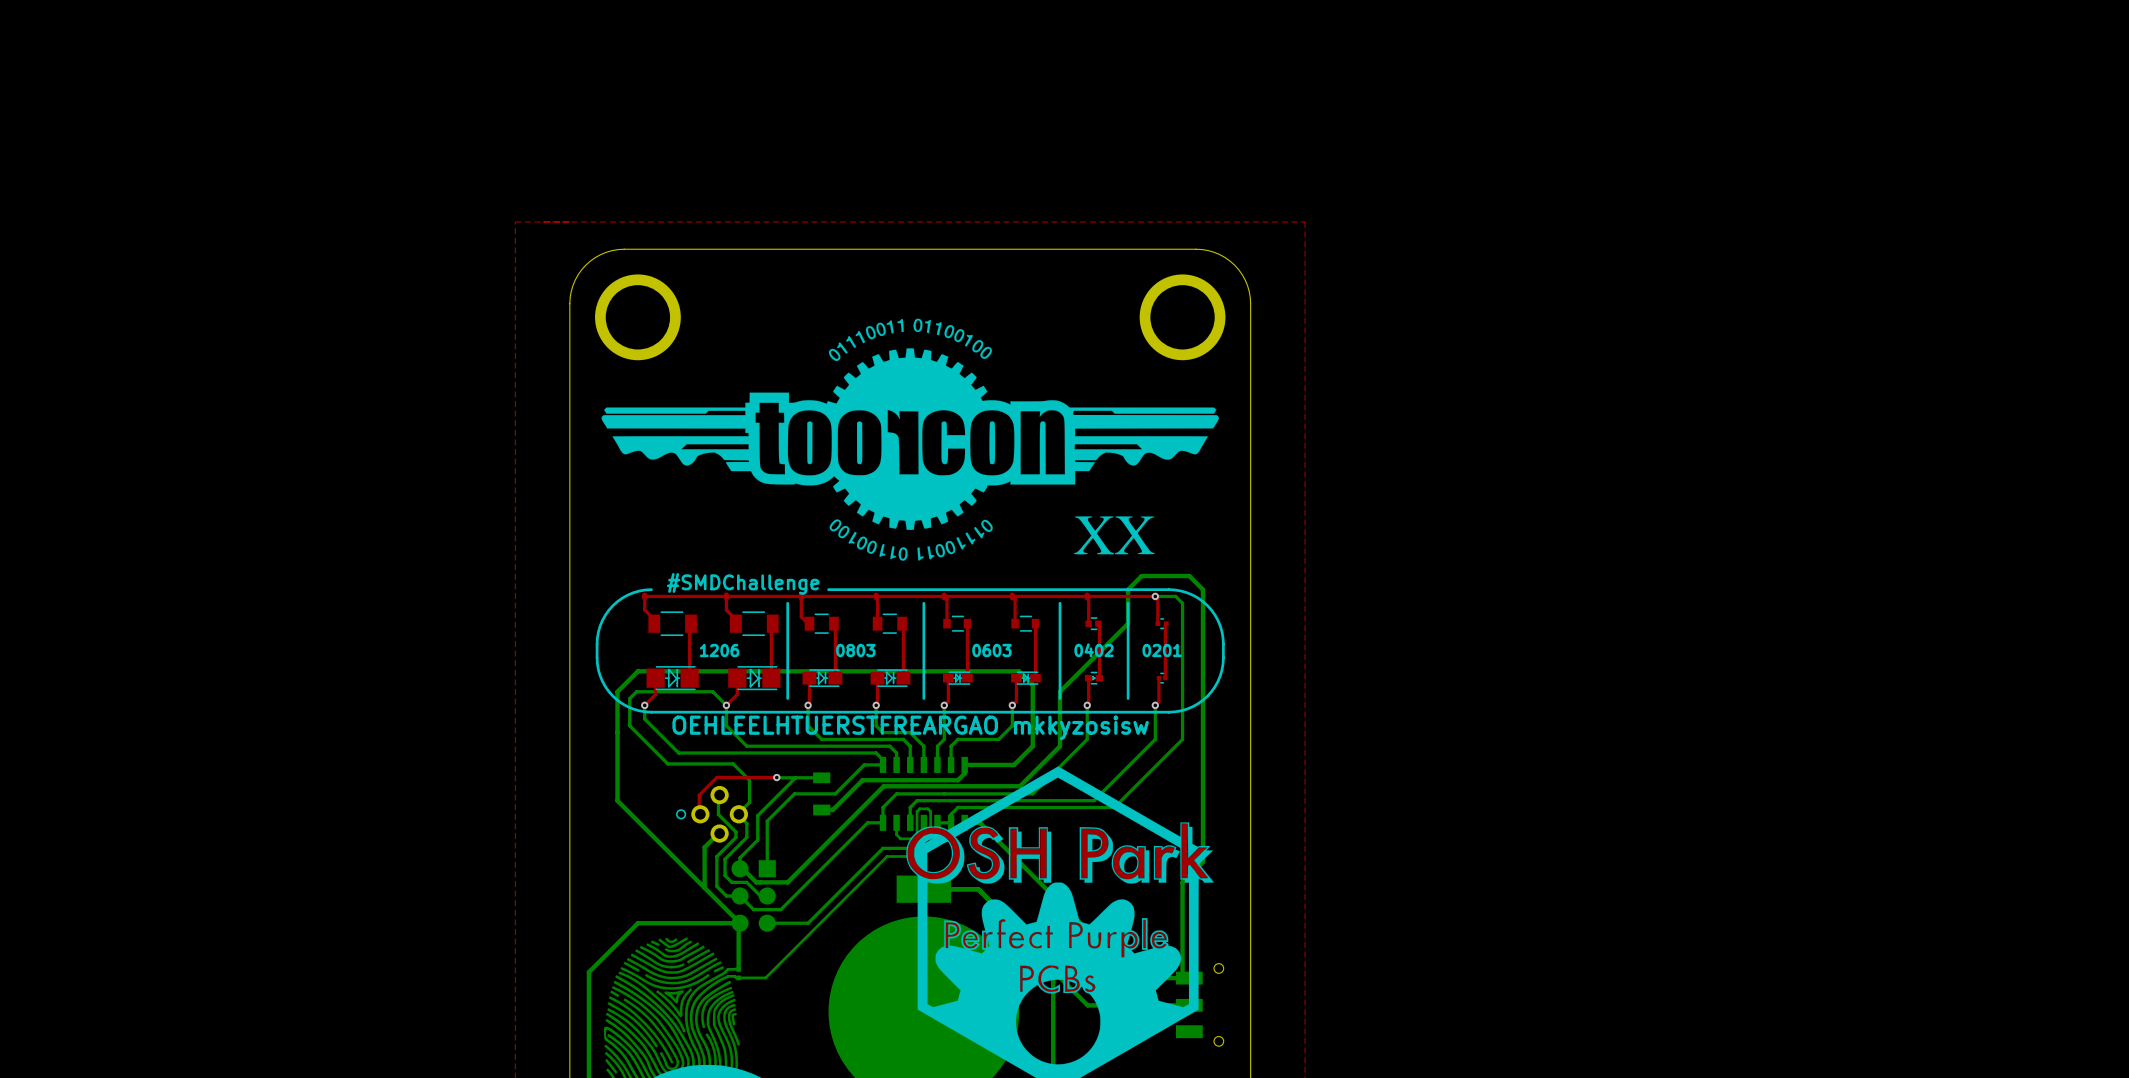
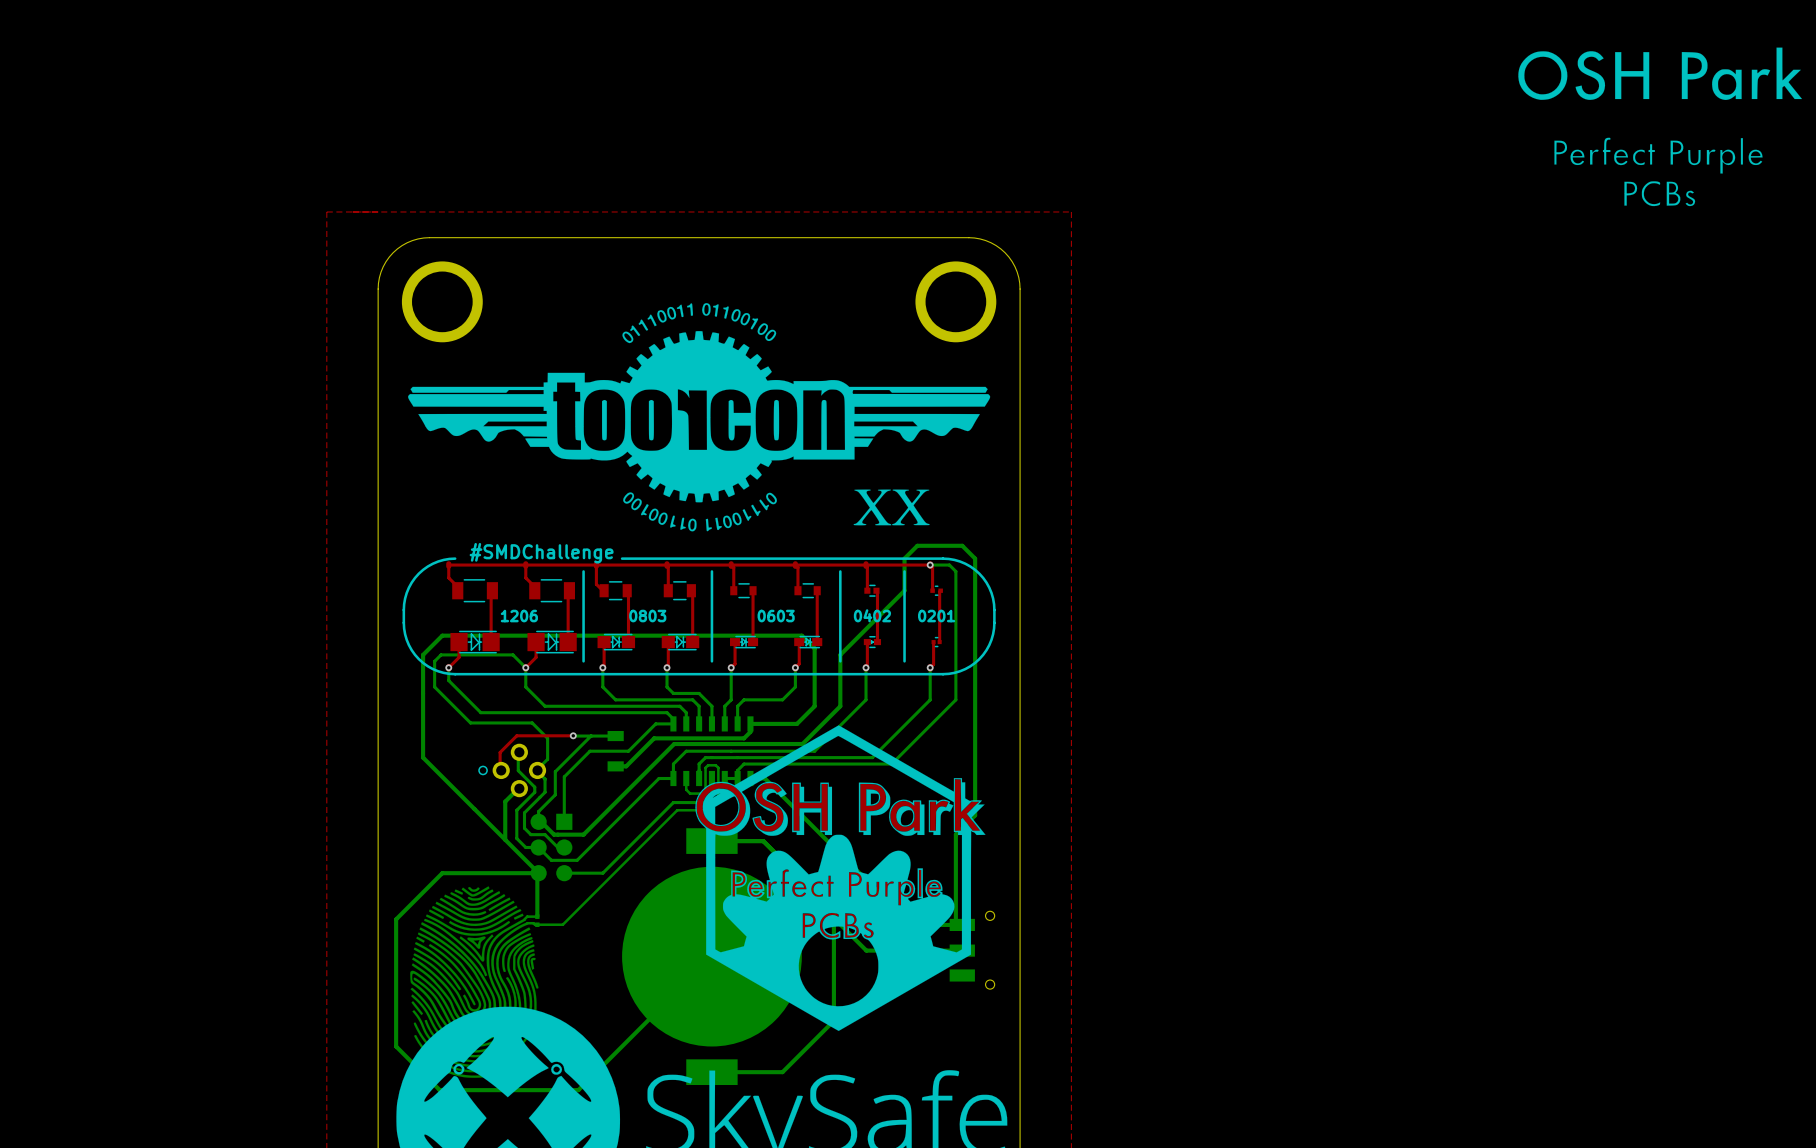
drawing: none -> [1518, 47, 1803, 207]
text: OEHLEELHTUERSTFREARGAO mkkyzosisw (910, 727) -> none

